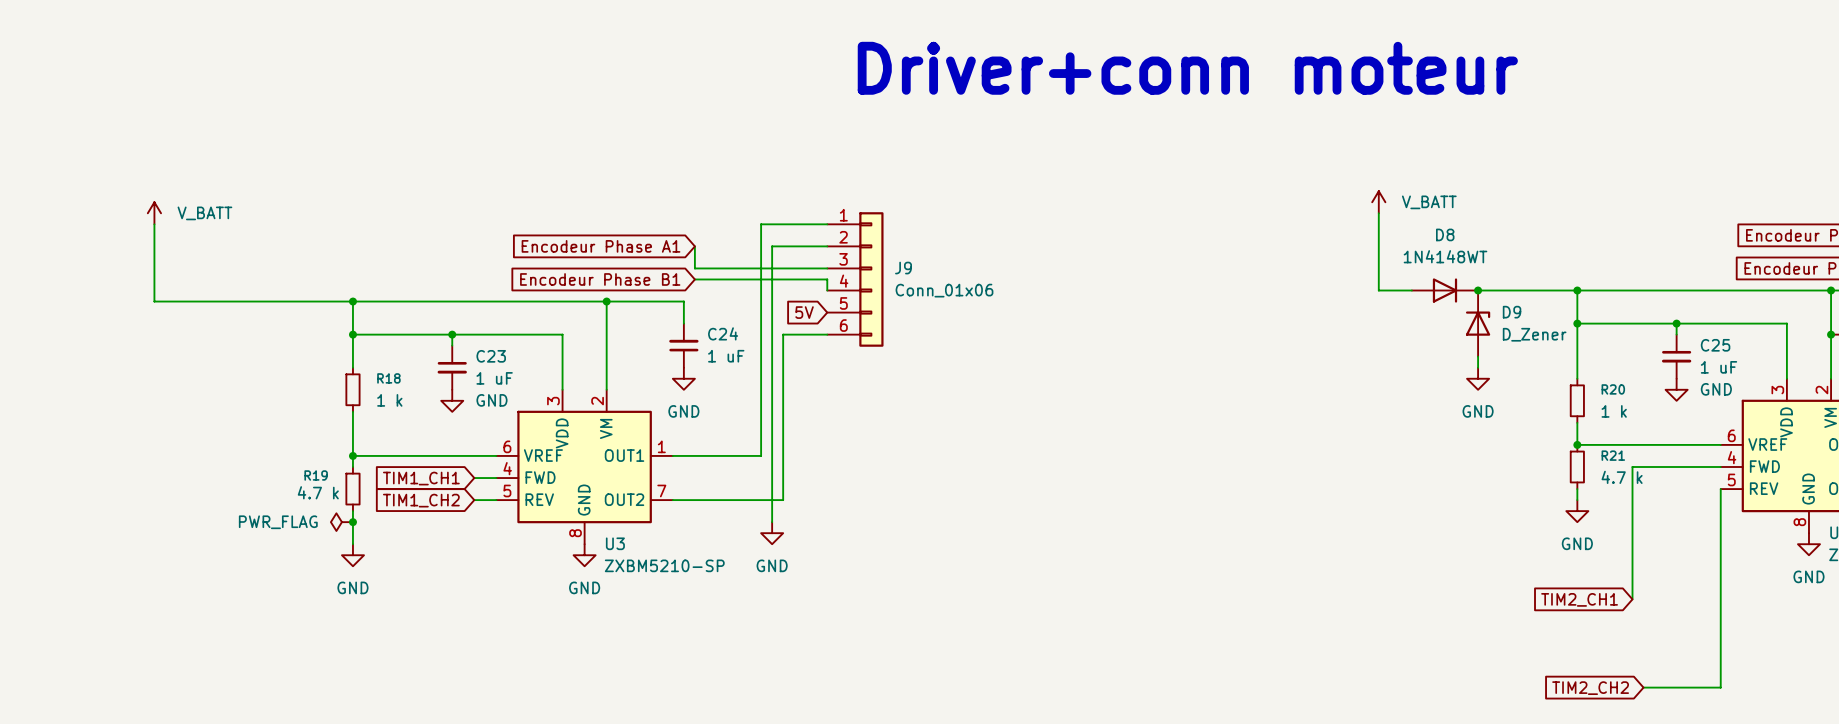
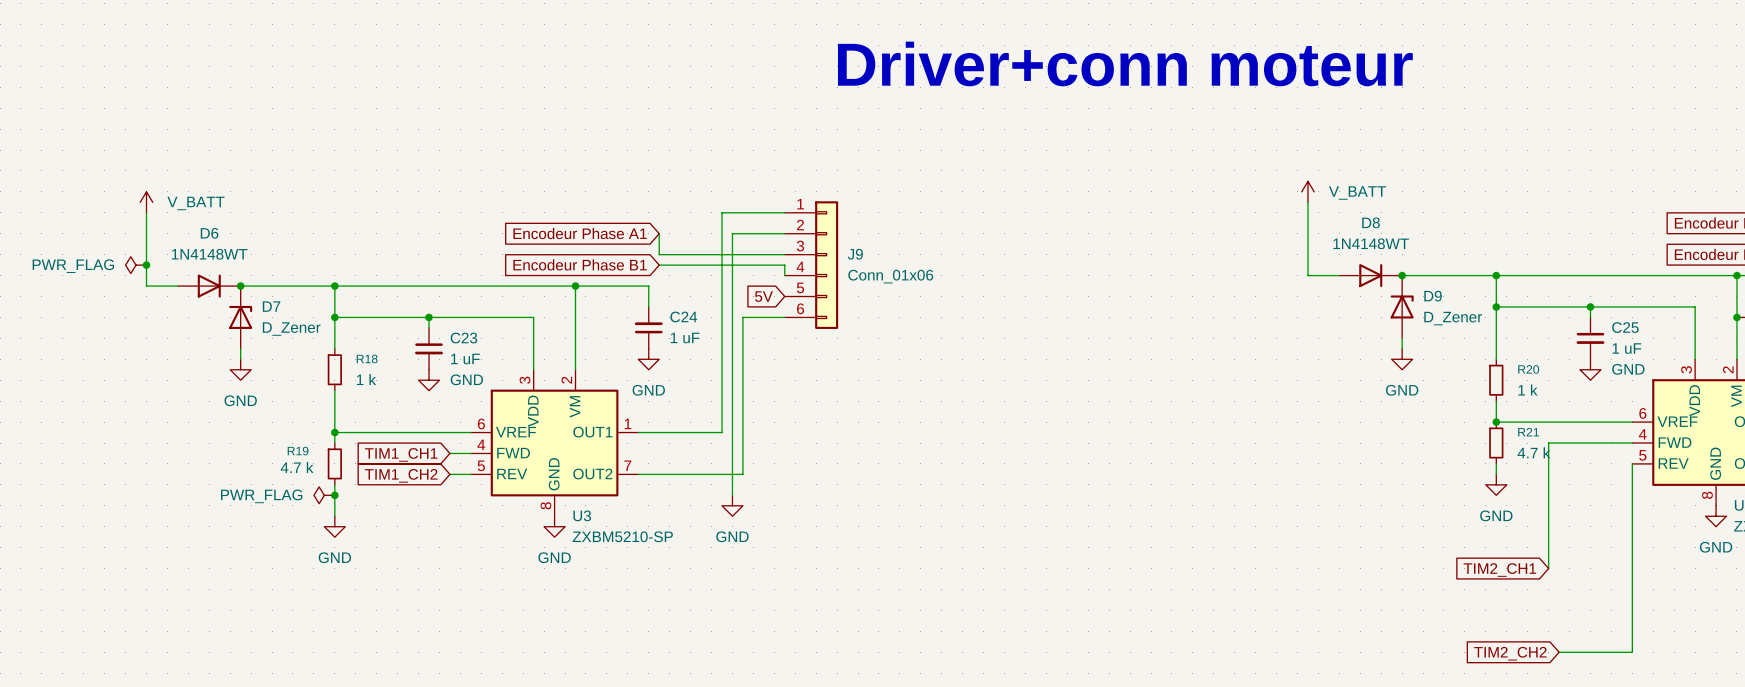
power symbol: none -> PWR_FLAG (136, 265)
junction: none -> (146, 265)
D6: none -> 1N4148WT (209, 286)
junction: none -> (240, 286)
D7: none -> D_Zener (240, 317)
wire: none -> (240, 348) (240, 359)
power symbol: none -> GND (240, 369)

